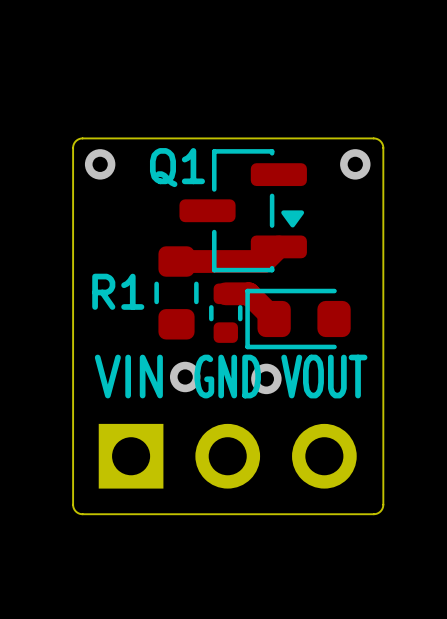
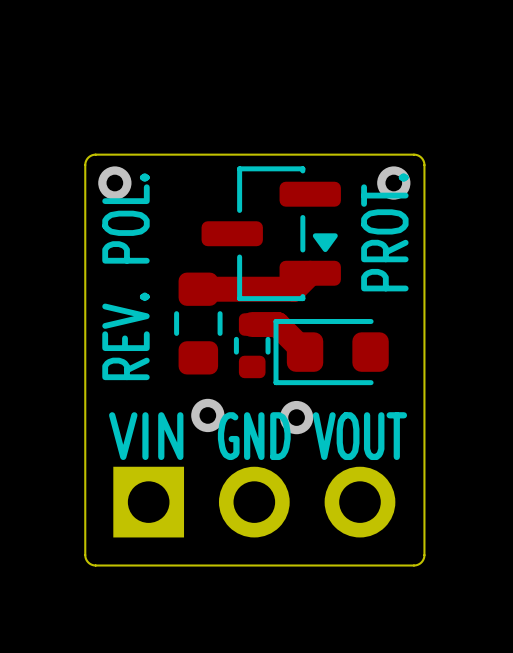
Q1 name: Q1 (177, 167) -> none
text: none -> PROT. (384, 232)
text: none -> REV. POL. (125, 276)
R1 name: R1 (118, 291) -> none
text position: VIN (128, 376) -> VIN (146, 436)
text position: GND (227, 376) -> GND (254, 436)
text position: VOUT (324, 376) -> VOUT (359, 436)

